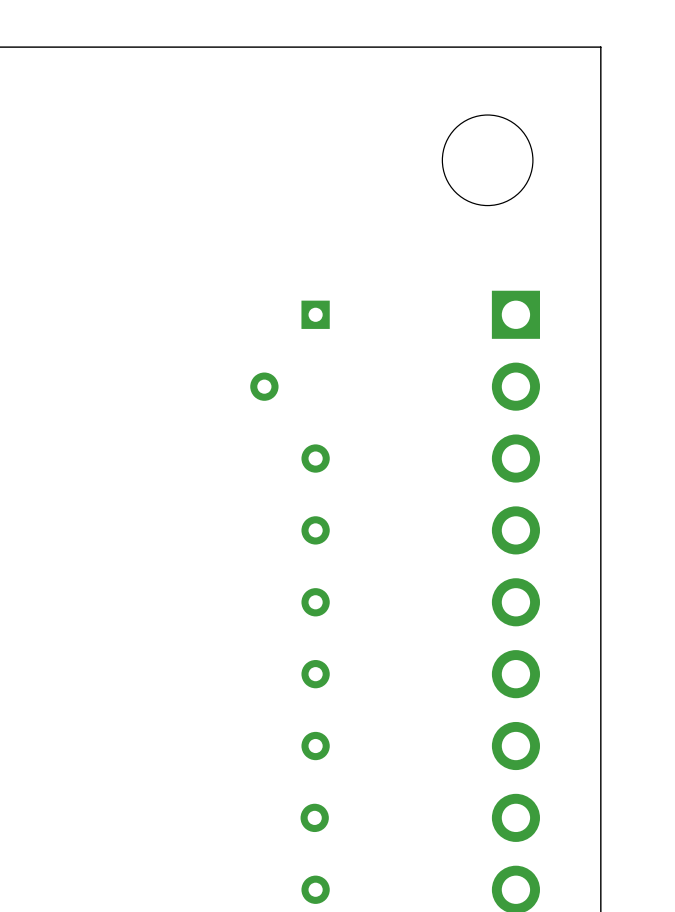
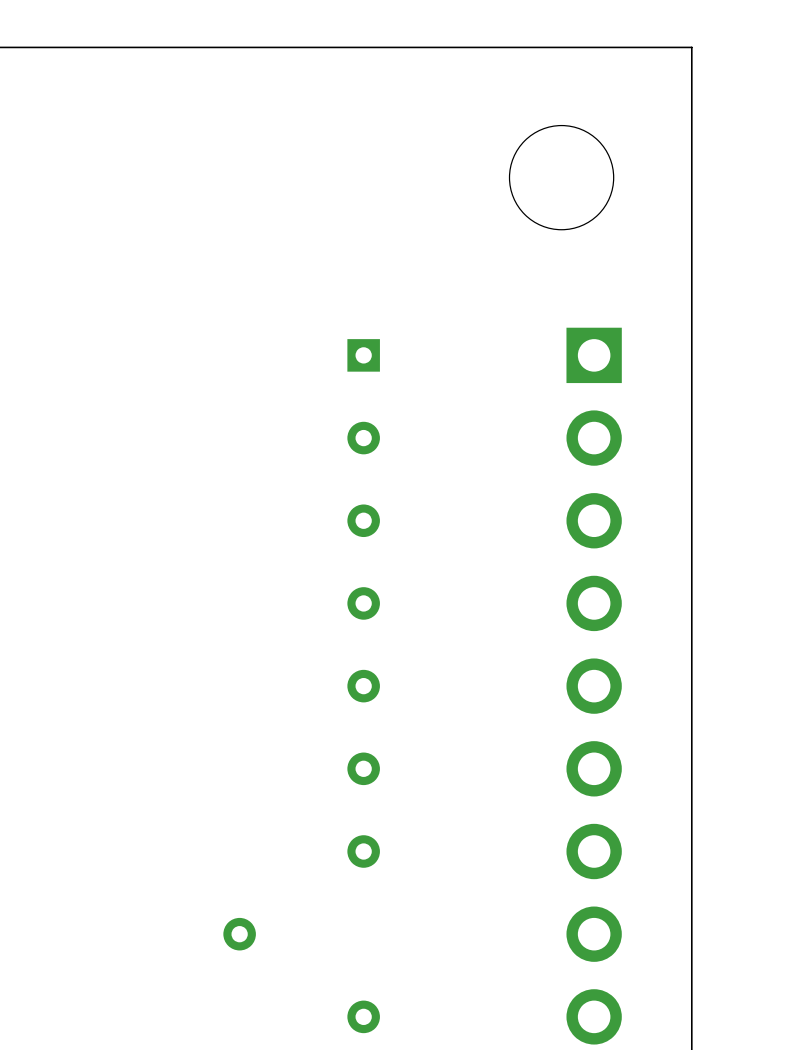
part position: (264, 386) -> (363, 438)
part position: (314, 817) -> (239, 934)

